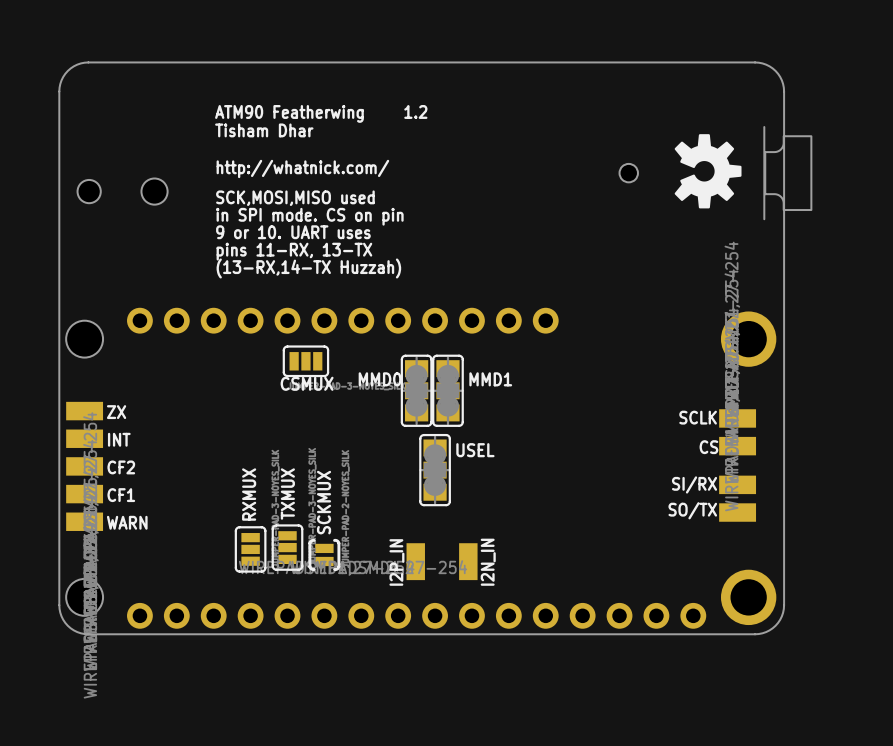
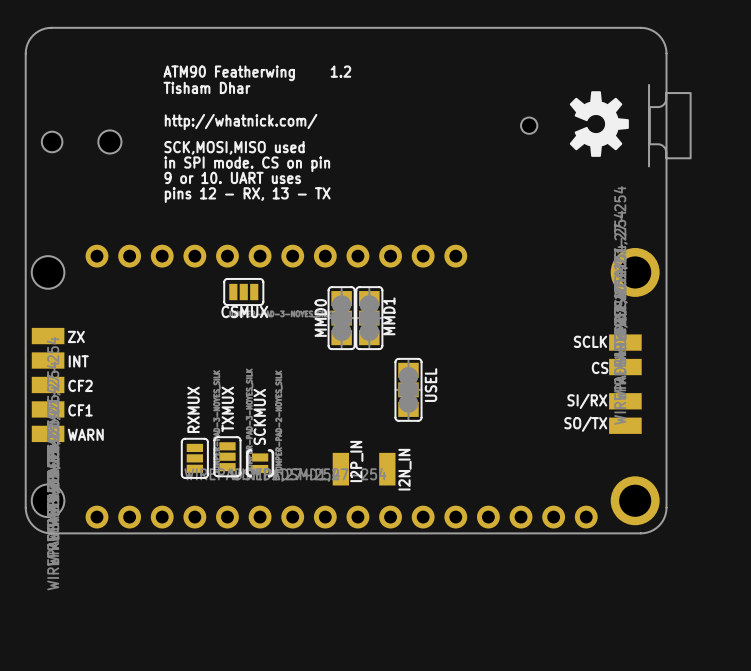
text: pins 11-RX, 13-TX (294, 251) -> pins 12 - RX, 13 - TX (247, 195)
text: (13-RX,14-TX Huzzah) (308, 268) -> none
MMD0 name rotation: 0° (380, 379) -> 90° counterclockwise (320, 317)
MMD1 name rotation: 0° (490, 379) -> 90° counterclockwise (389, 316)
USEL name rotation: 0° (475, 450) -> 90° counterclockwise (431, 385)
USEL position: (435, 470) -> (408, 389)
I2P_IN name position: I2P_IN (396, 562) -> I2P_IN (356, 461)

